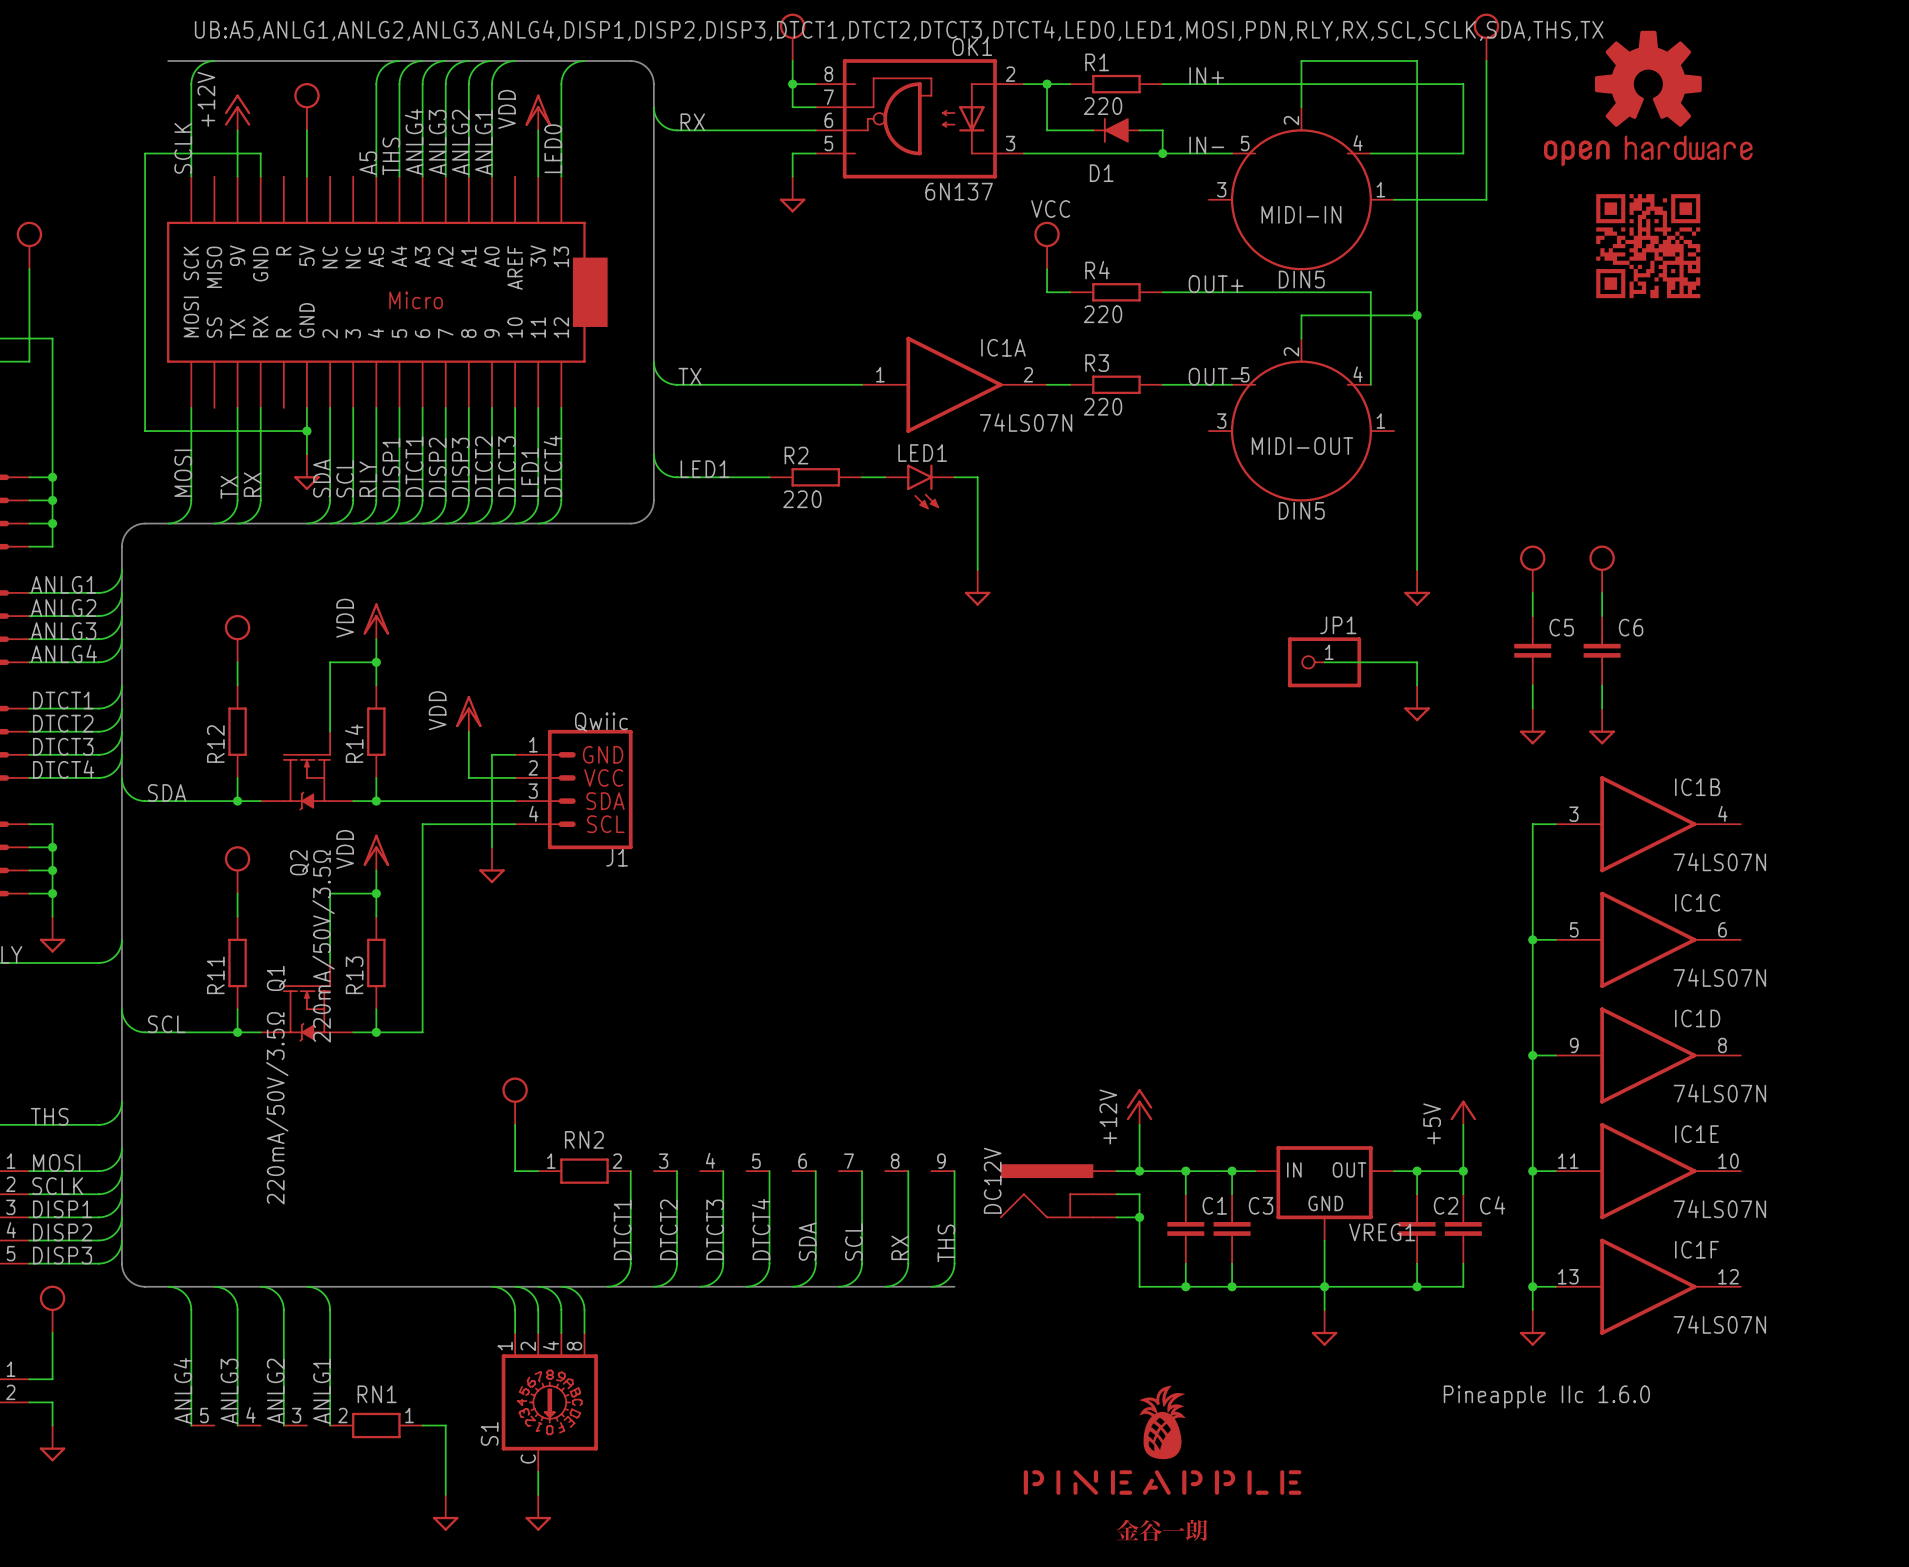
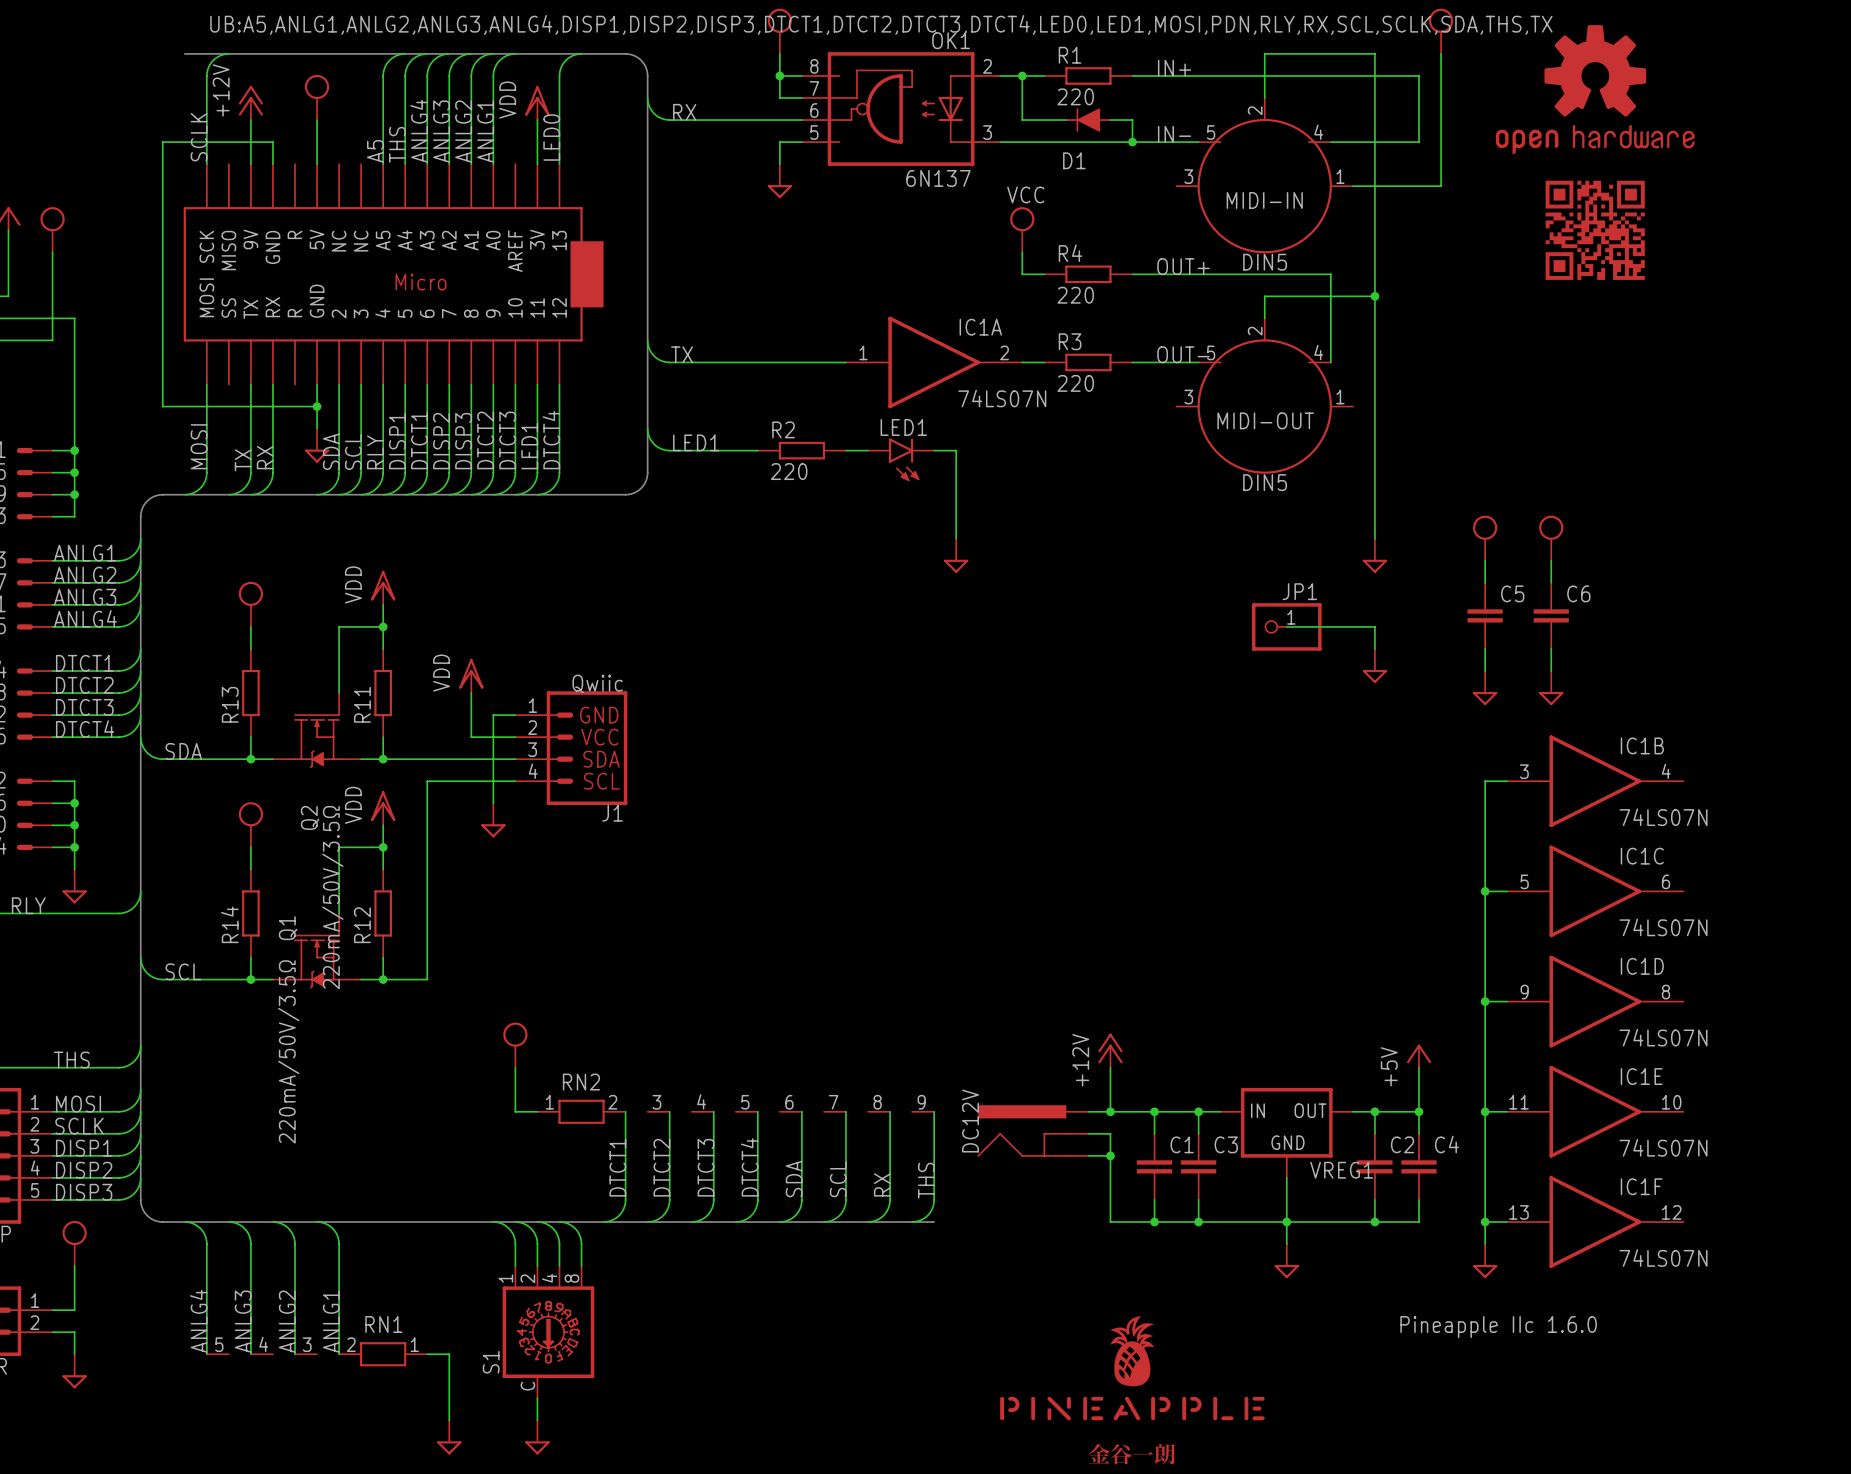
R14 name: R14 (354, 743) -> R11 (362, 704)
R12 name: R12 (215, 744) -> R13 (230, 704)
R11 name: R11 (215, 975) -> R14 (229, 924)
R13 name: R13 (354, 975) -> R12 (362, 925)

